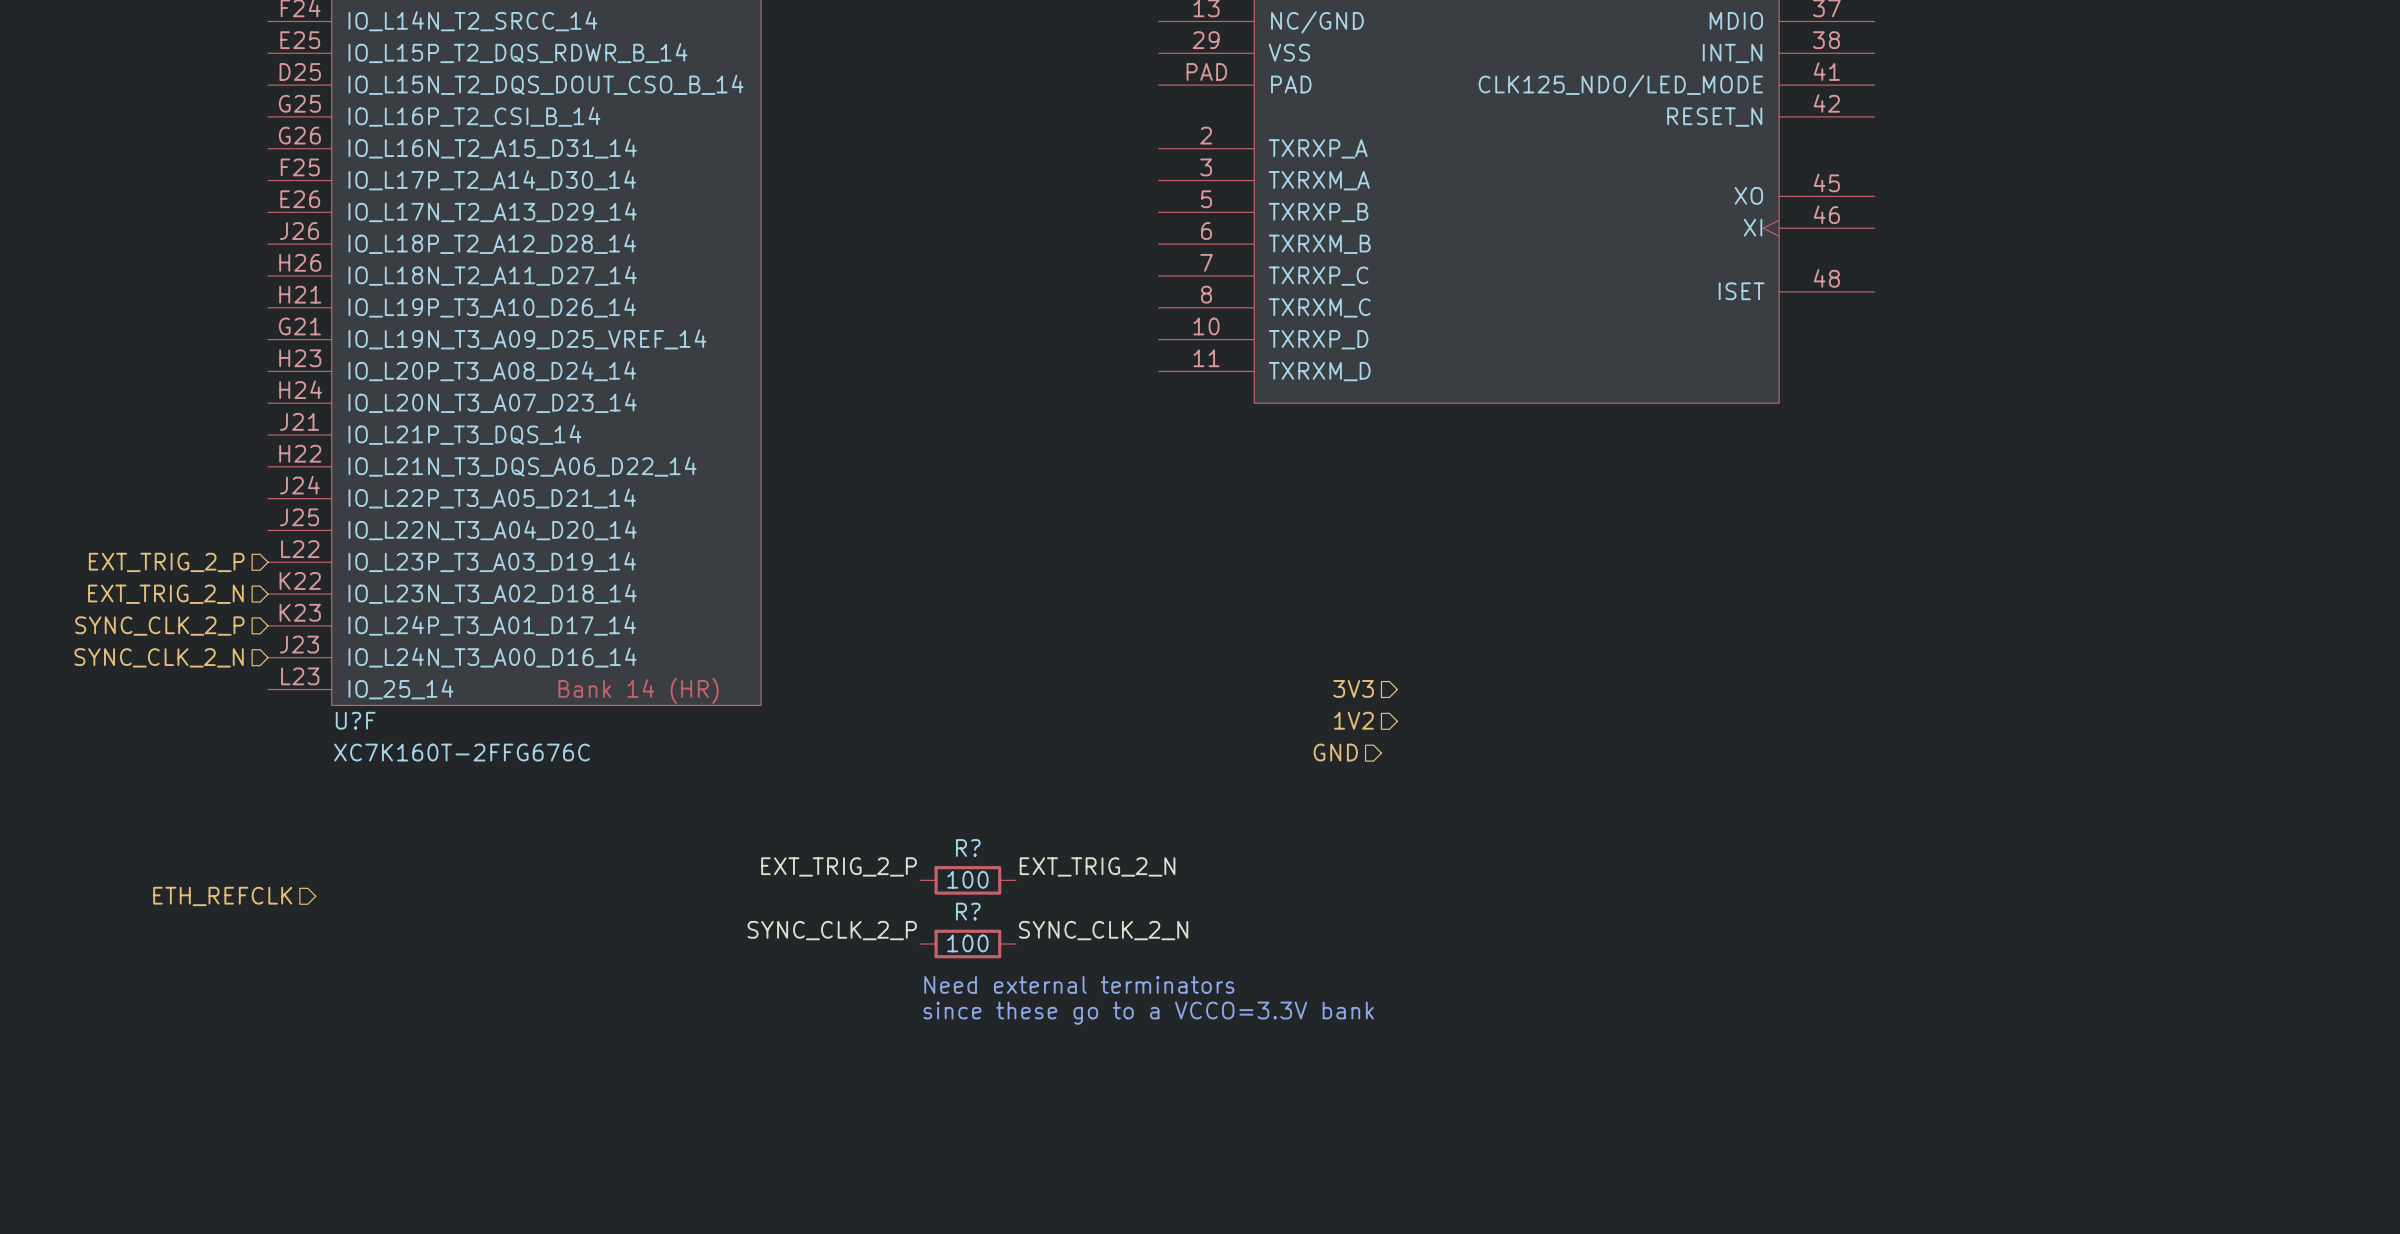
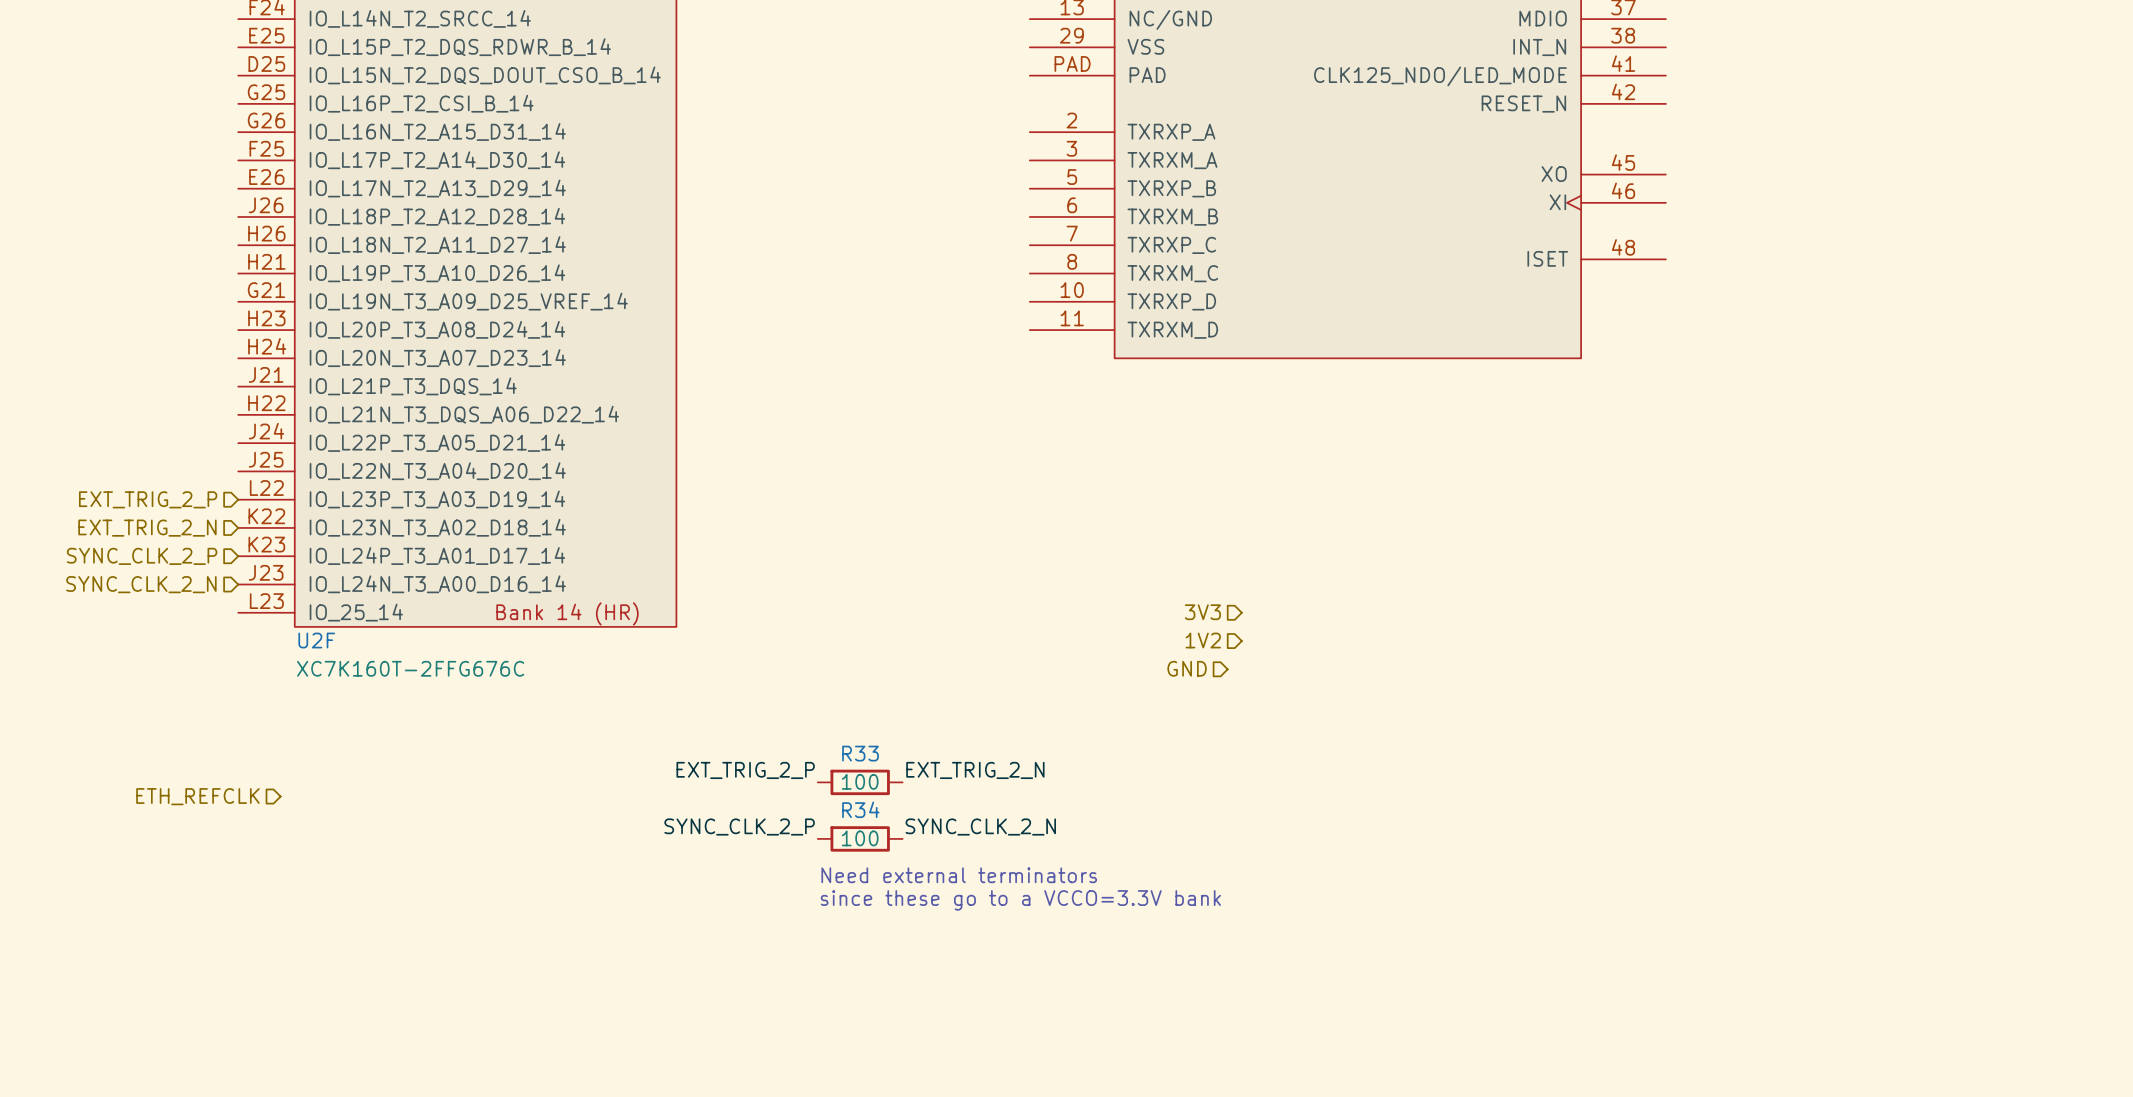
U?F name: U?F (355, 720) -> U2F (316, 640)
R? name: R? (968, 847) -> R33 (860, 753)
R? name: R? (968, 911) -> R34 (860, 809)

